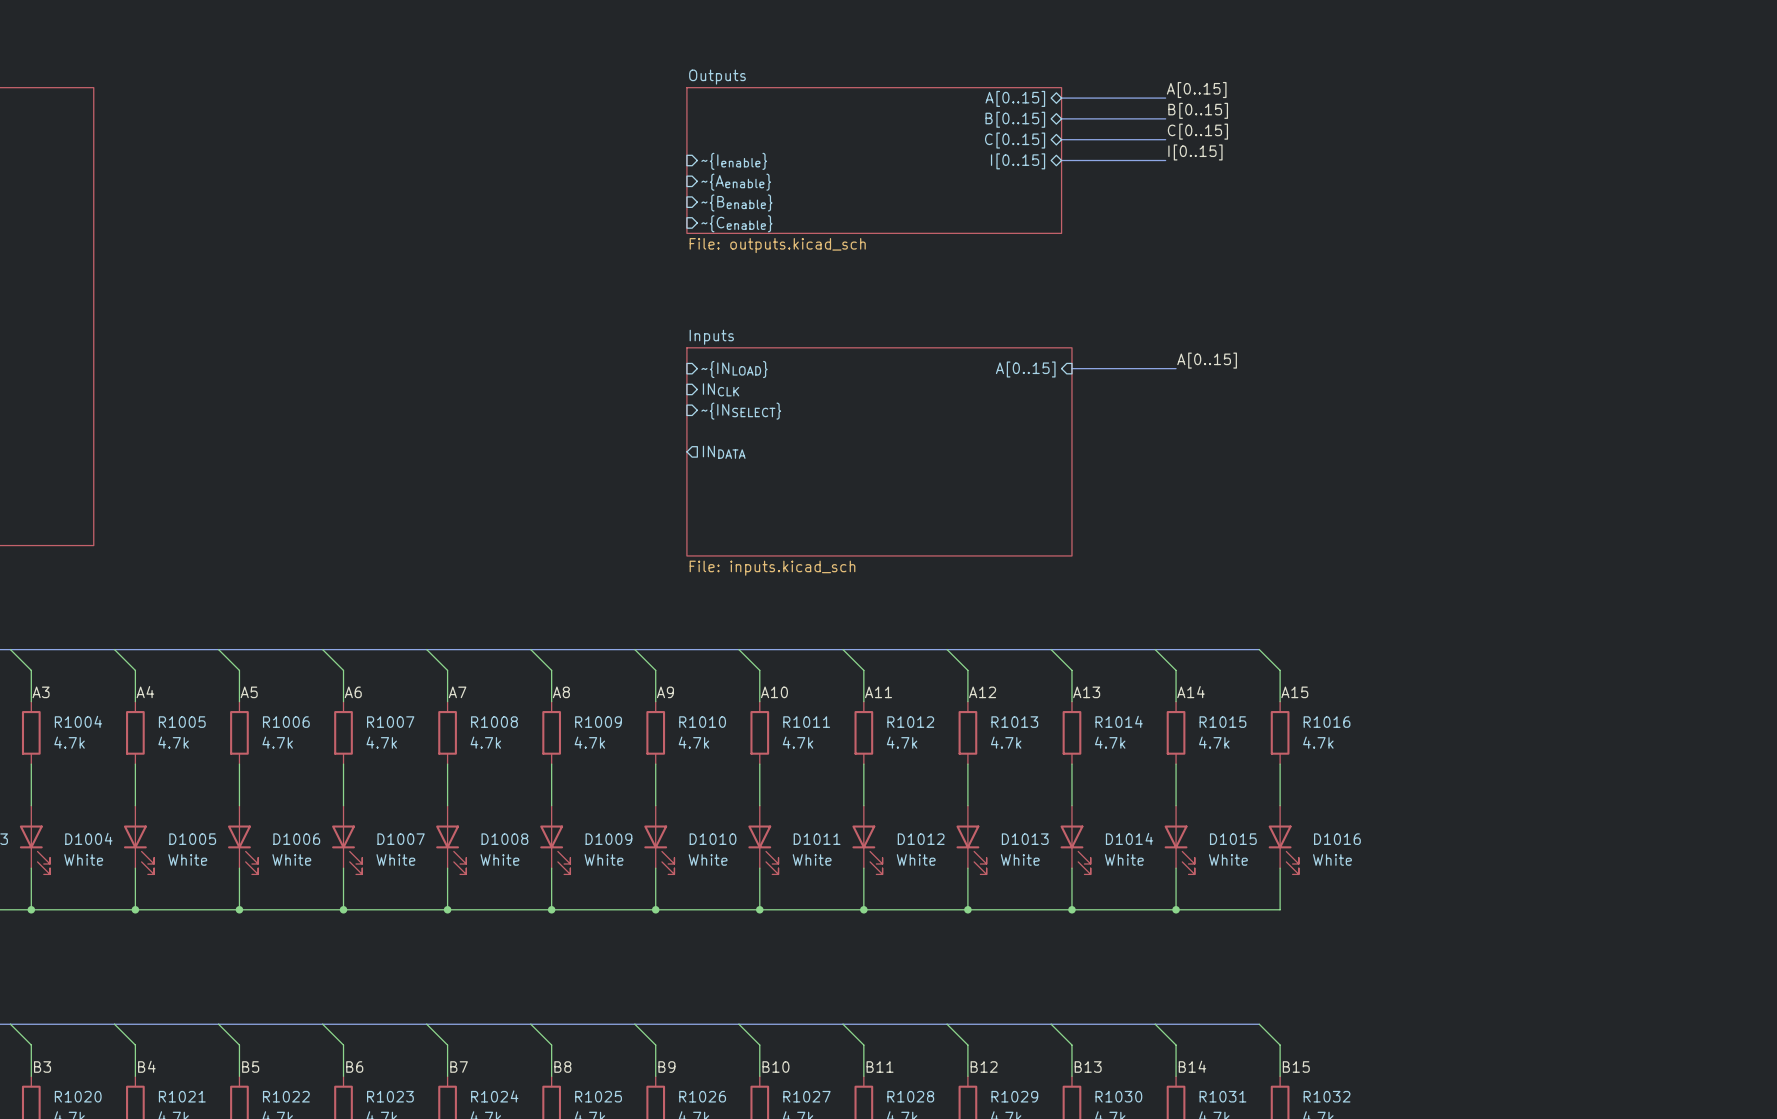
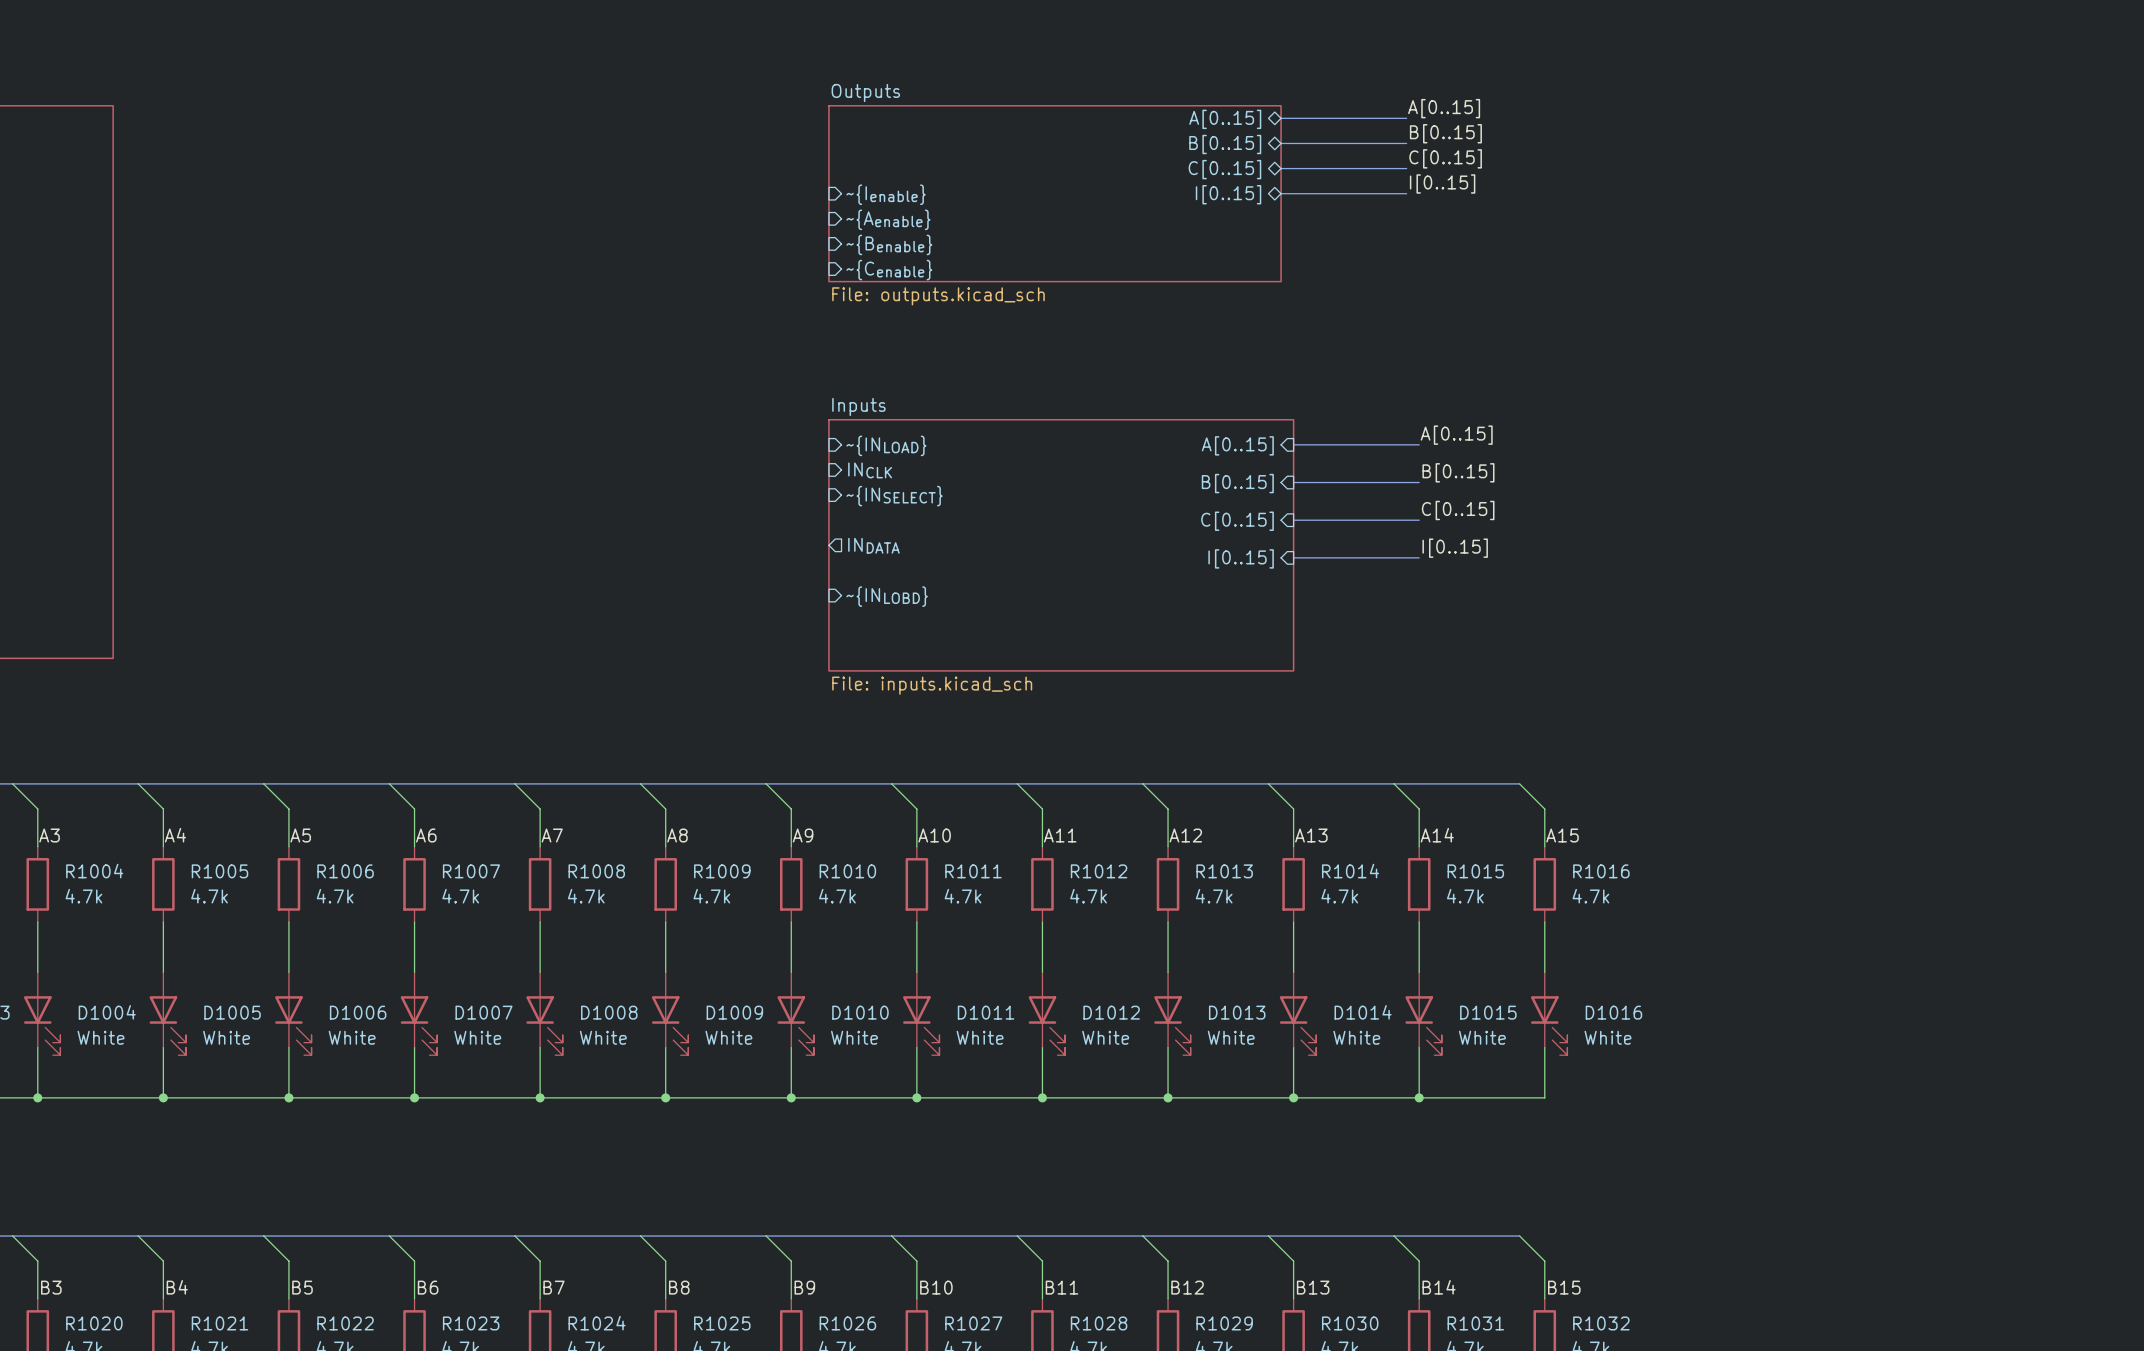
label: none -> B[0..15] (1458, 472)
bus: none -> (1293, 482) (1419, 482)
sheet pin: none -> B[0..15] (1237, 483)
label: none -> C[0..15] (1458, 510)
sheet pin: none -> C[0..15] (1237, 521)
bus: none -> (1293, 520) (1419, 520)
label: none -> I[0..15] (1455, 548)
bus: none -> (1293, 557) (1419, 557)
sheet pin: none -> I[0..15] (1241, 558)
sheet pin: none -> ~{INLOBD} (887, 596)

